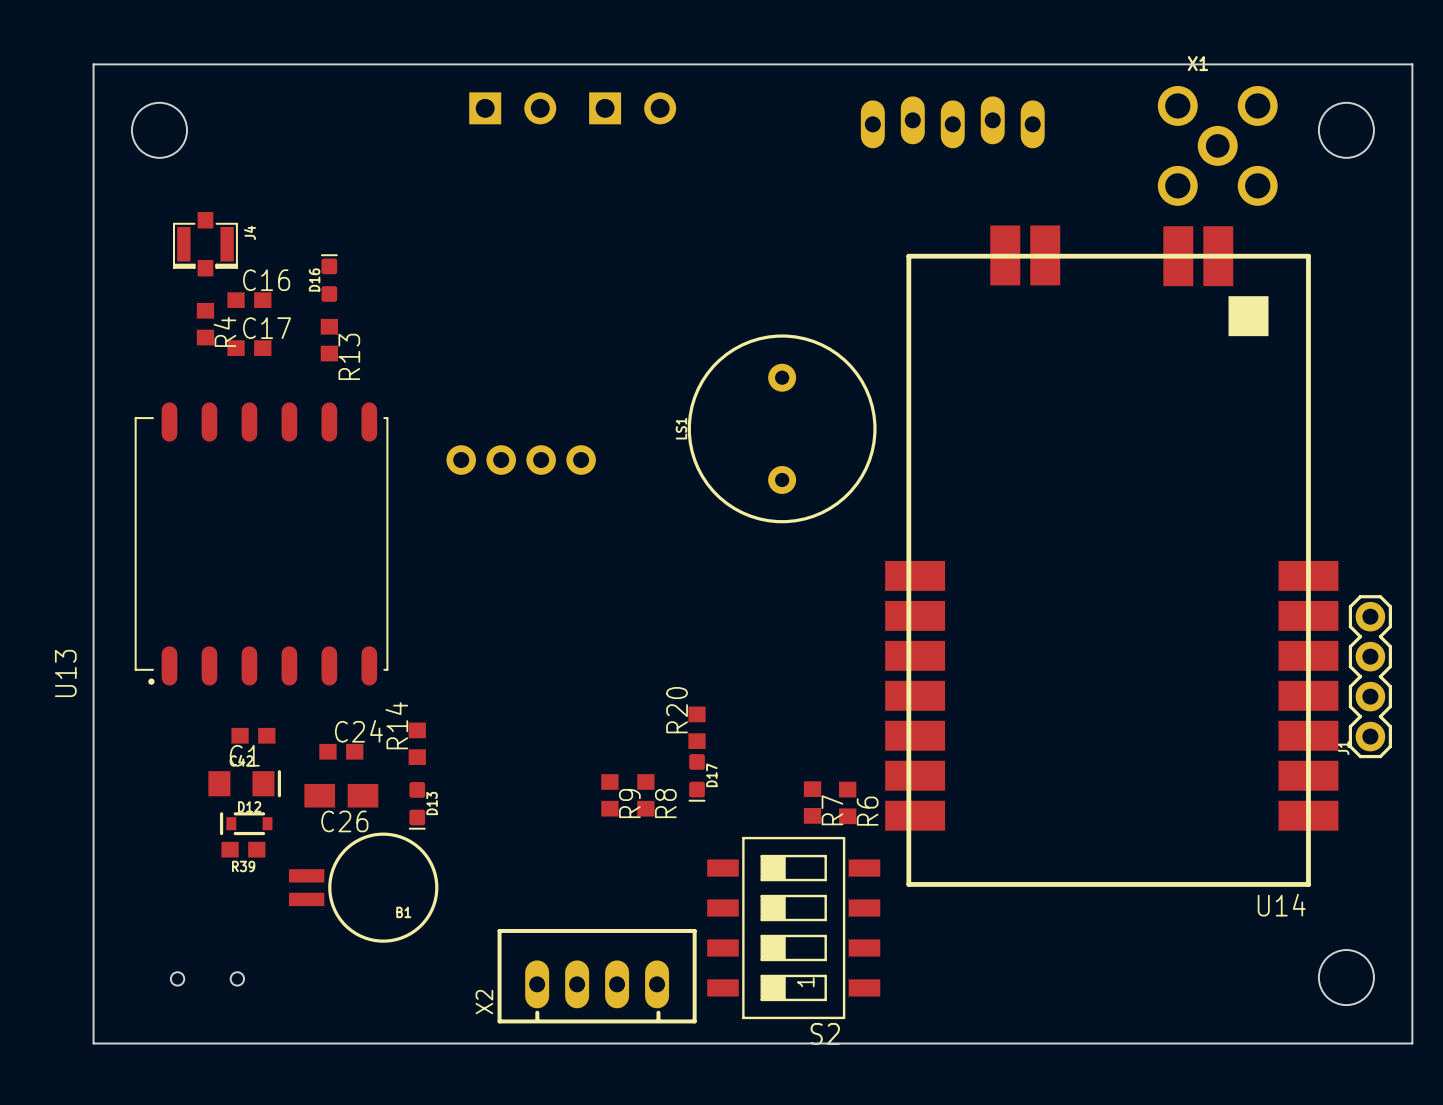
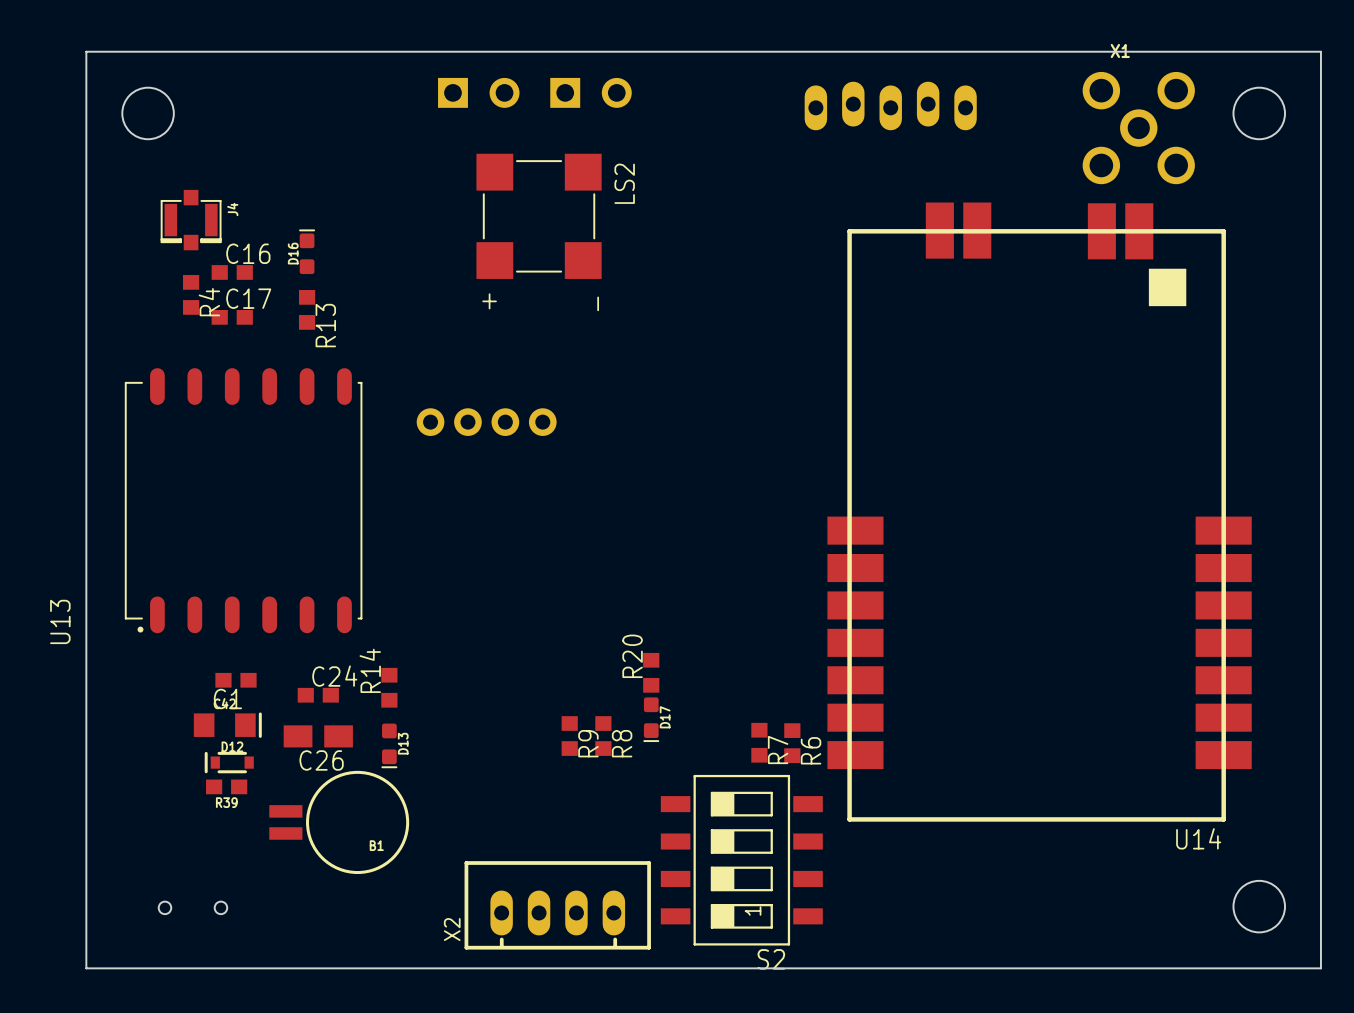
LS2: none -> (539, 216)
LS1: (782, 428) -> none
J1: (1370, 676) -> none

